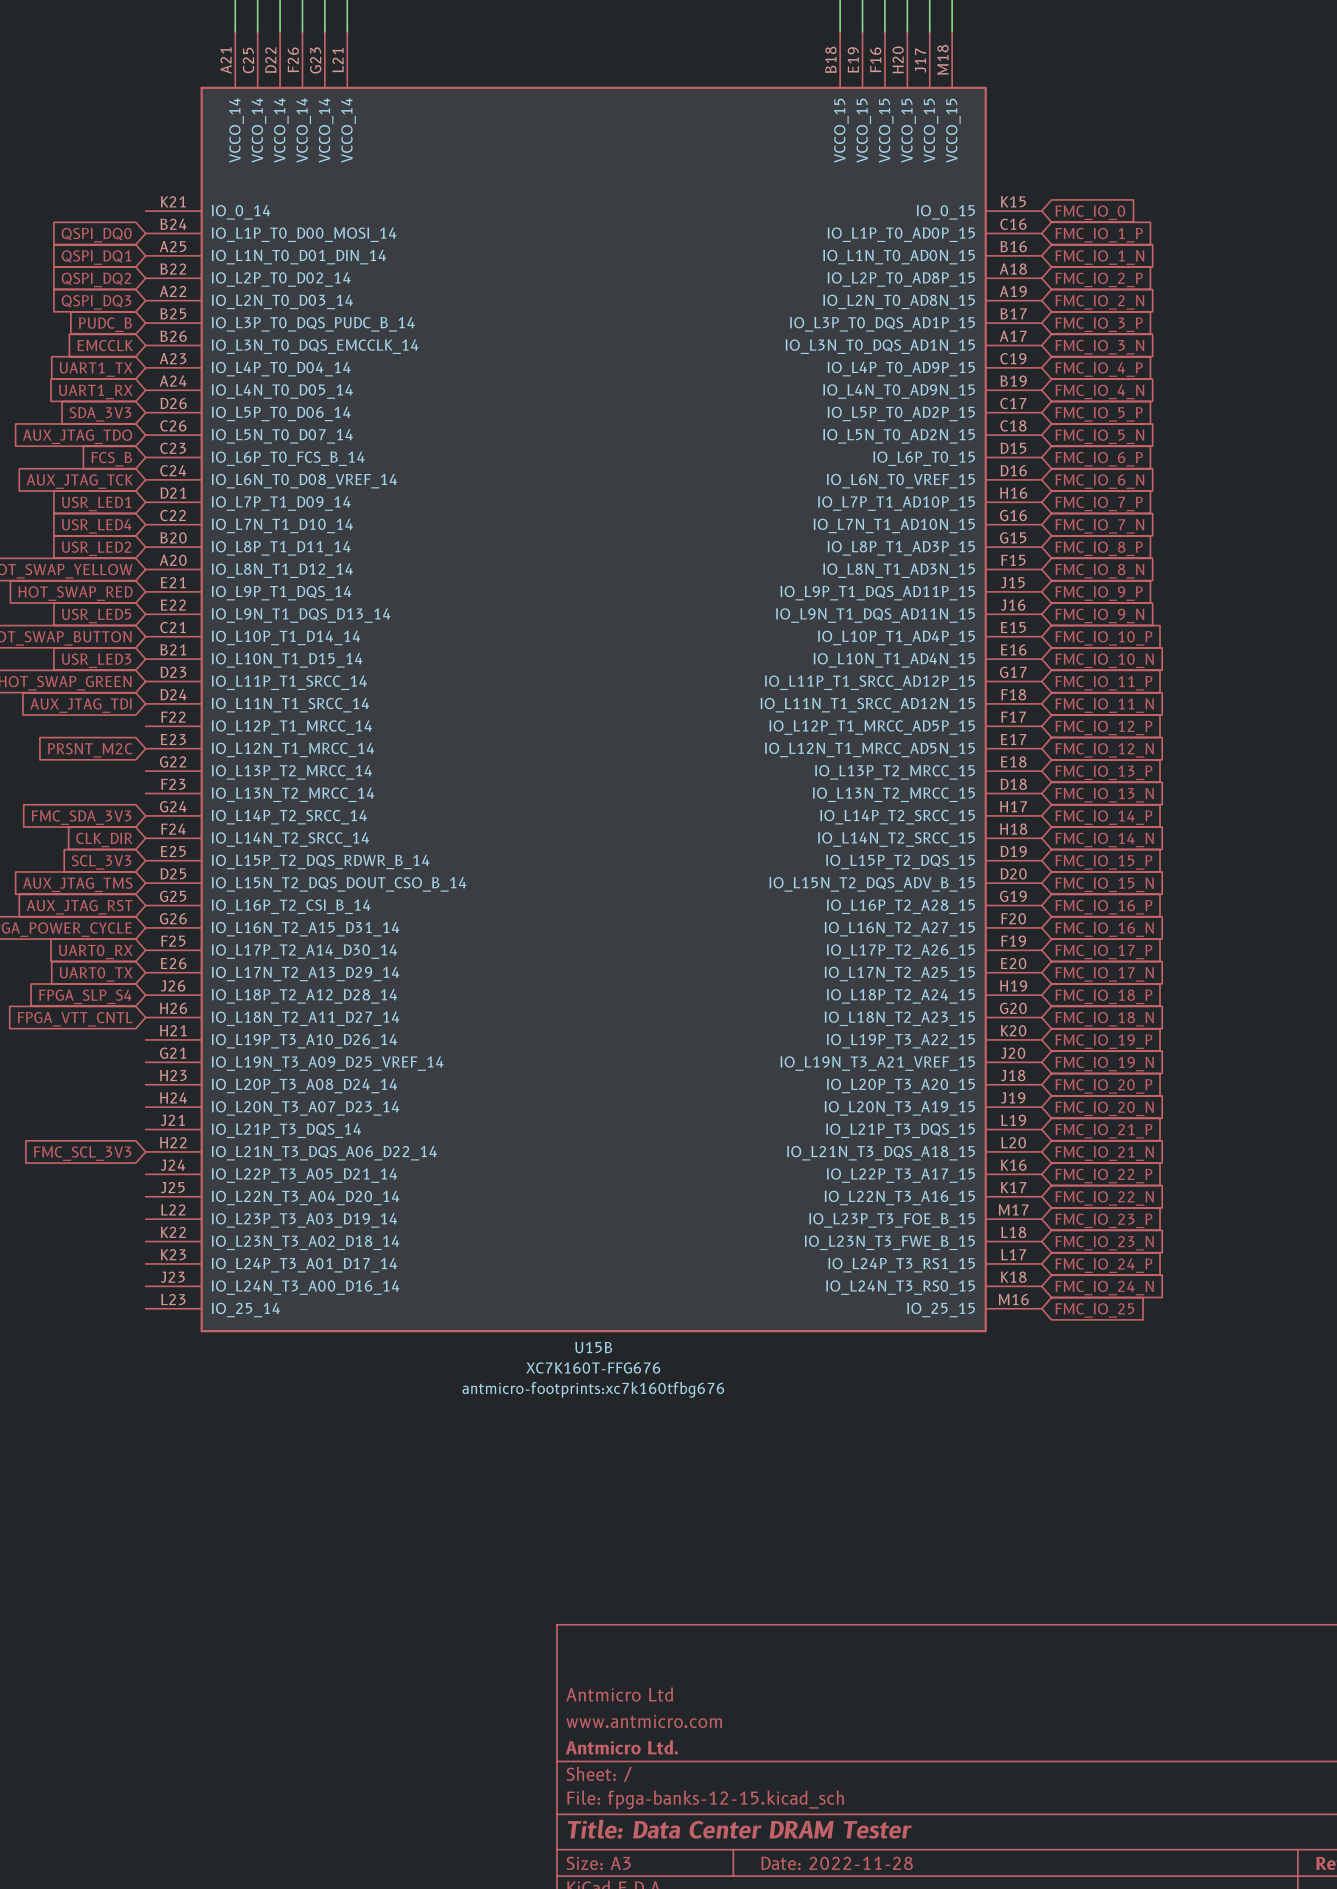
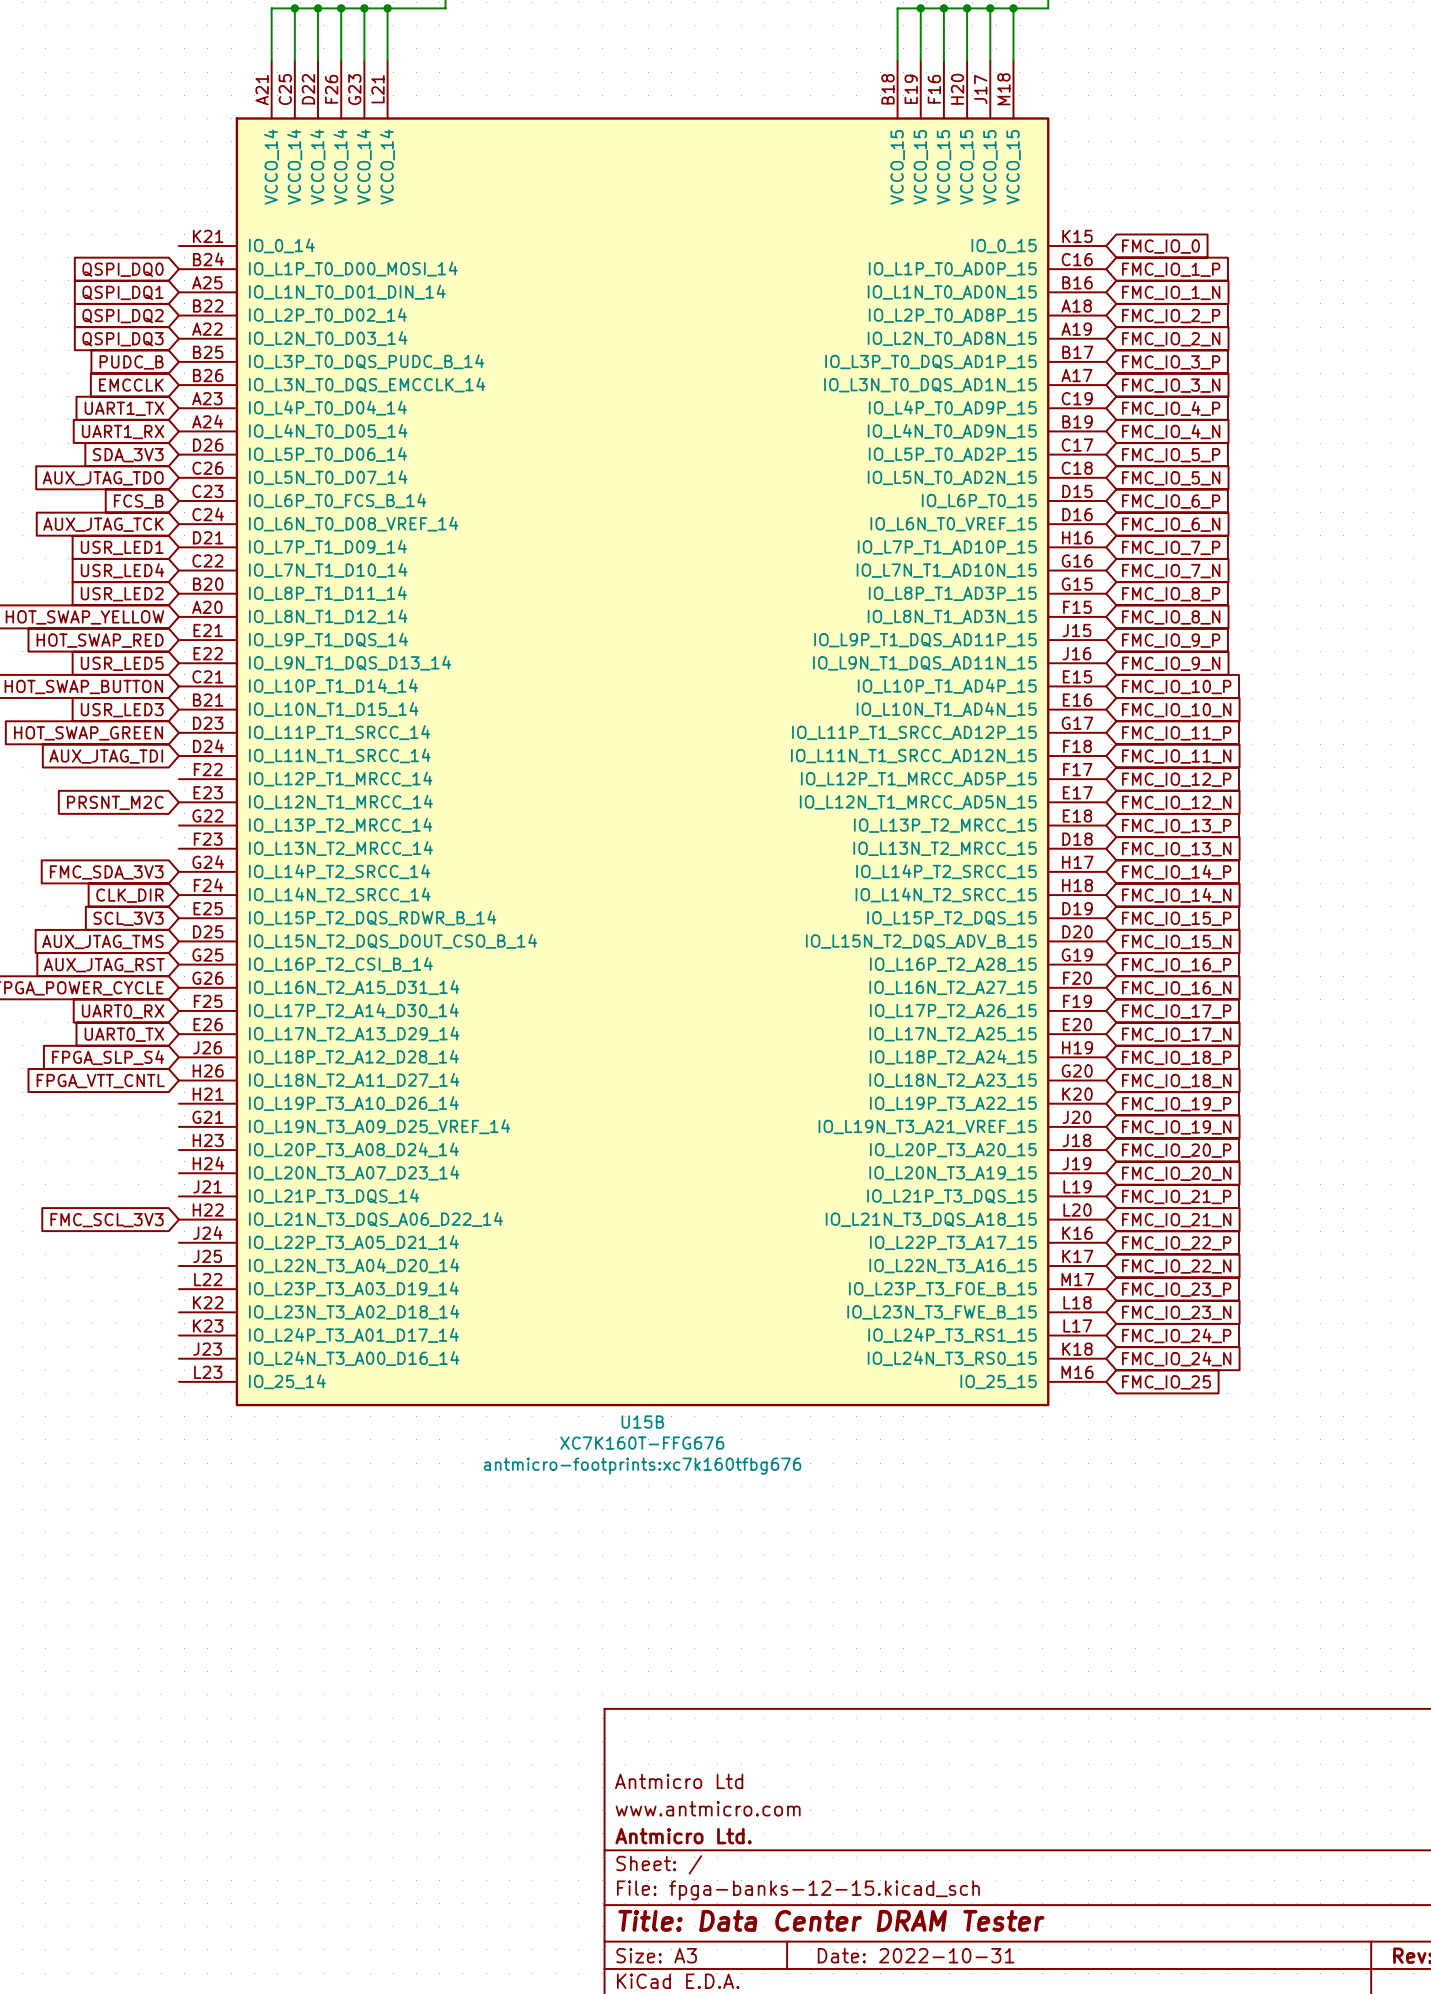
title block: Date: 2022-11-28 (837, 1863) -> Date: 2022-10-31 (916, 1955)

